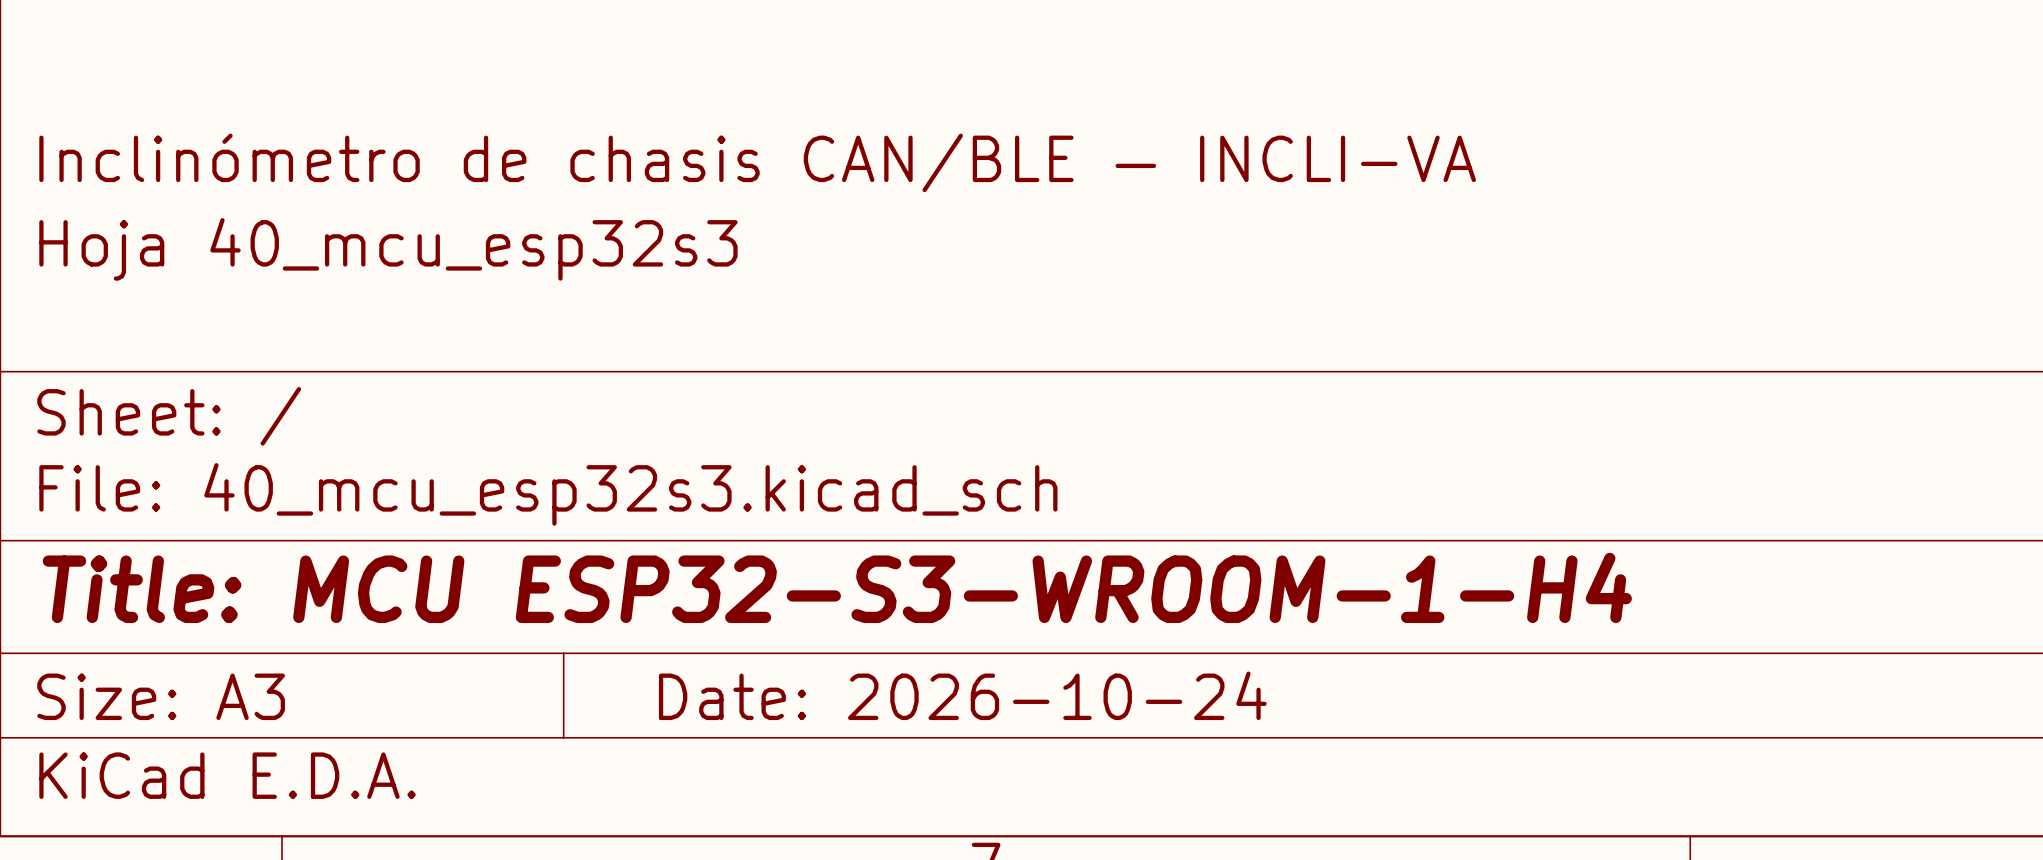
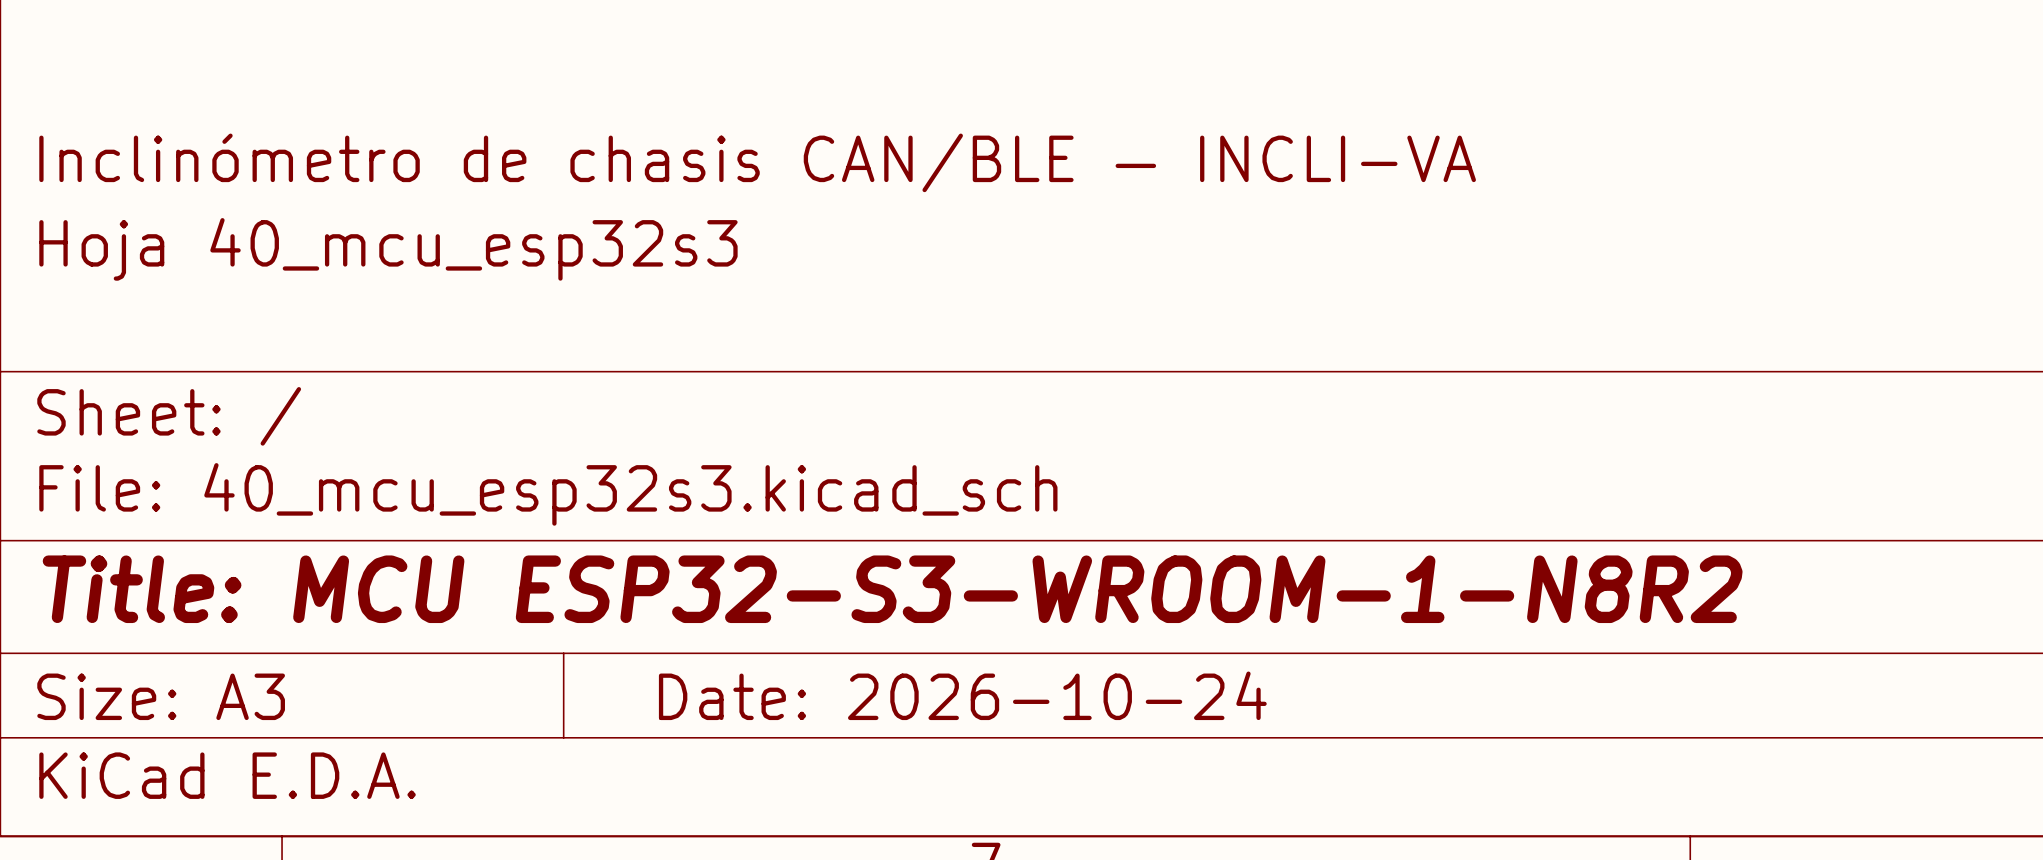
title block: Title: MCU ESP32-S3-WROOM-1-H4 (837, 587) -> Title: MCU ESP32-S3-WROOM-1-N8R2 (892, 589)

